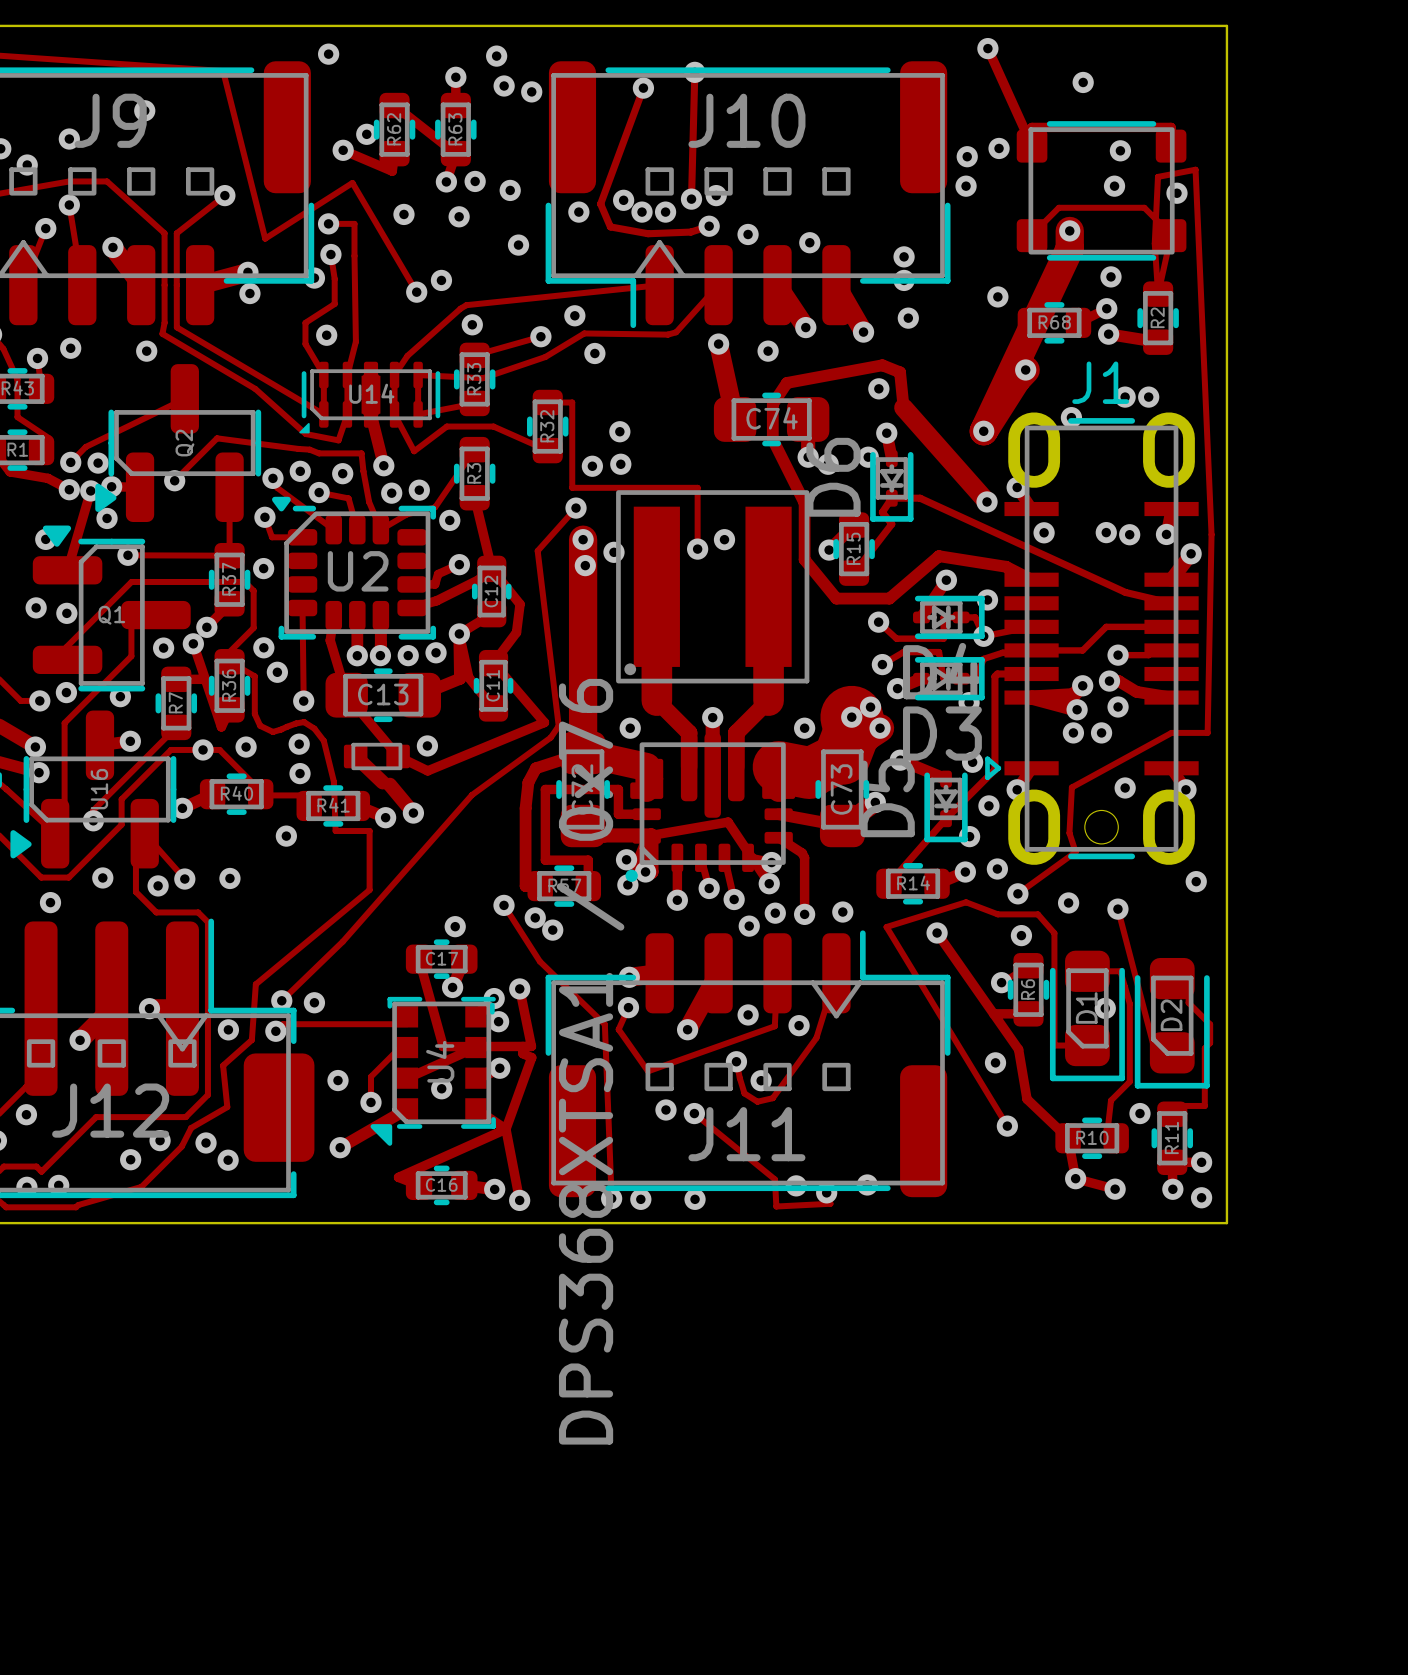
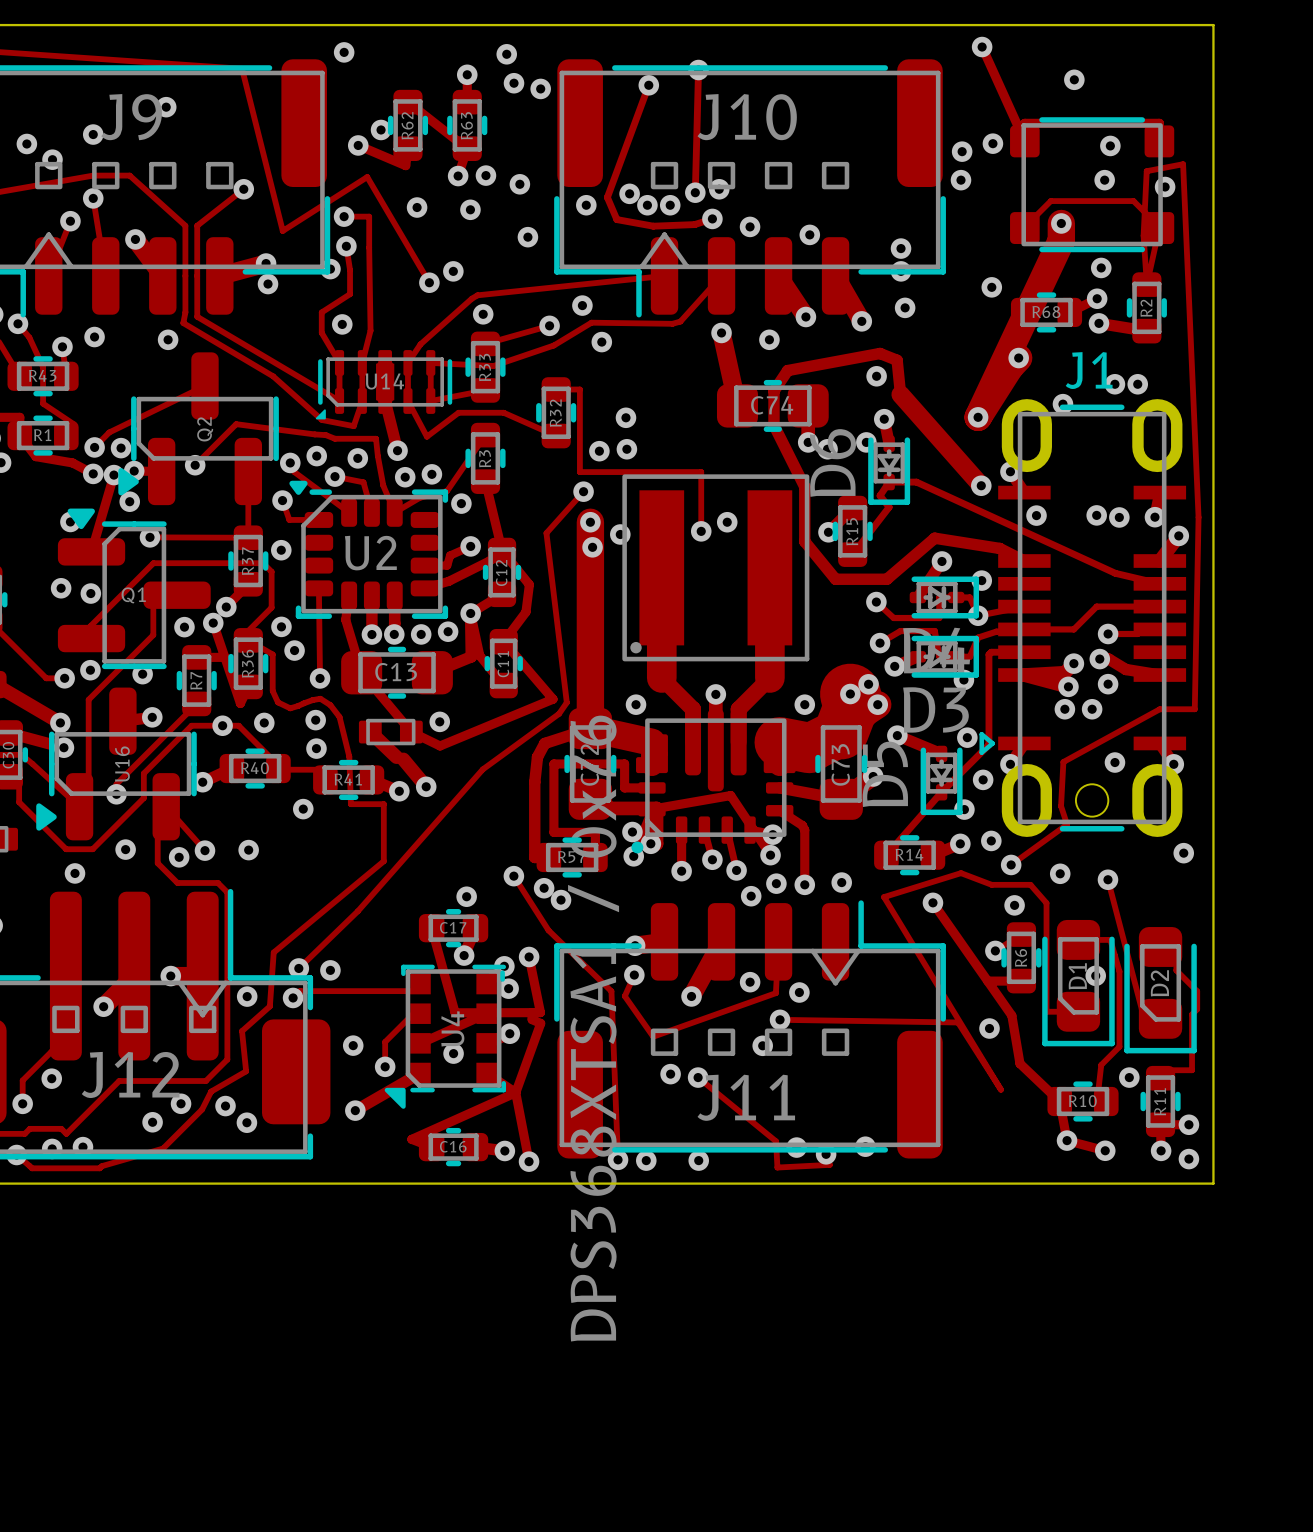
track: (836, 973) (816, 1038) (772, 1098) (757, 1101) (744, 1093) (736, 1061) -> none
track: none -> (780, 1019) (958, 1022) (1000, 1089)
via position: (736, 1061) -> (780, 1019)
via: (1007, 1126) -> none

